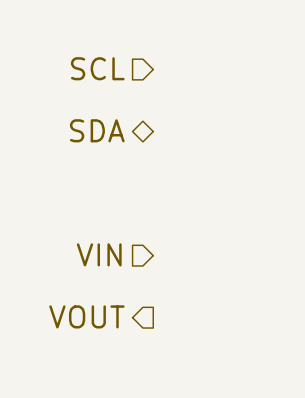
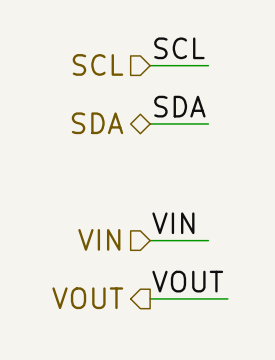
label: none -> SCL (179, 48)
wire: none -> (150, 65) (208, 65)
label: none -> SDA (179, 106)
wire: none -> (150, 123) (208, 123)
label: none -> VIN (173, 223)
wire: none -> (150, 240) (208, 240)
label: none -> VOUT (187, 281)
wire: none -> (150, 298) (227, 298)

